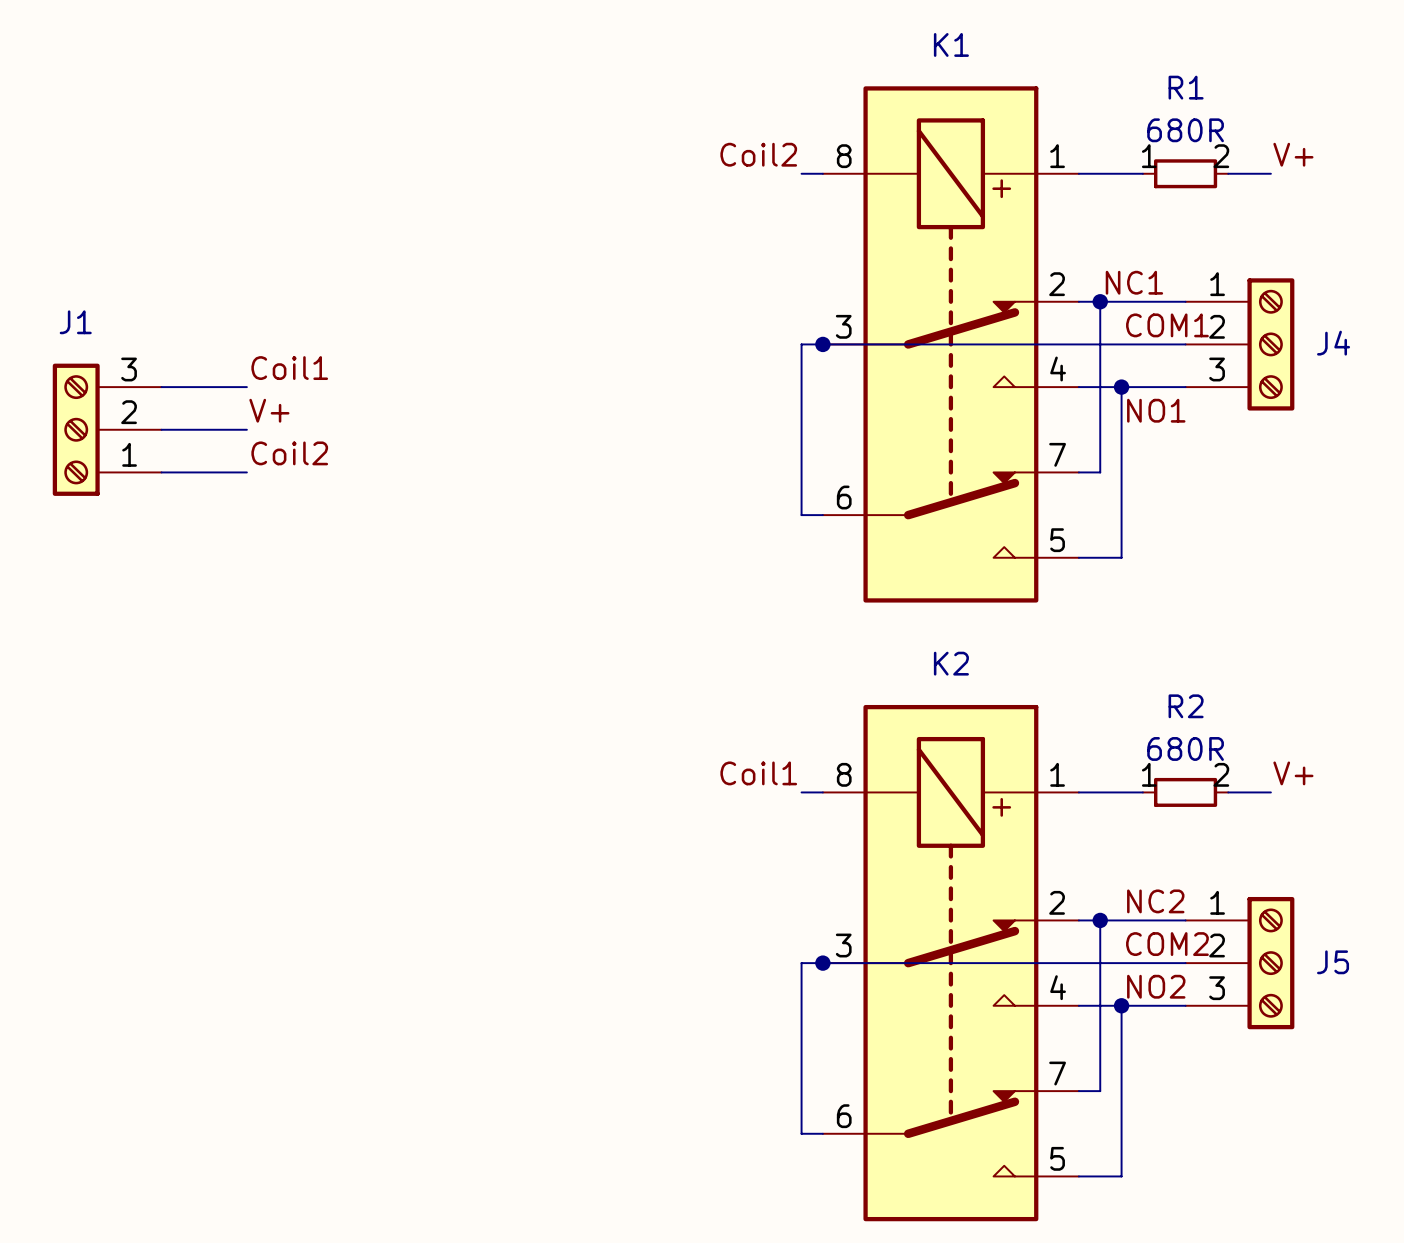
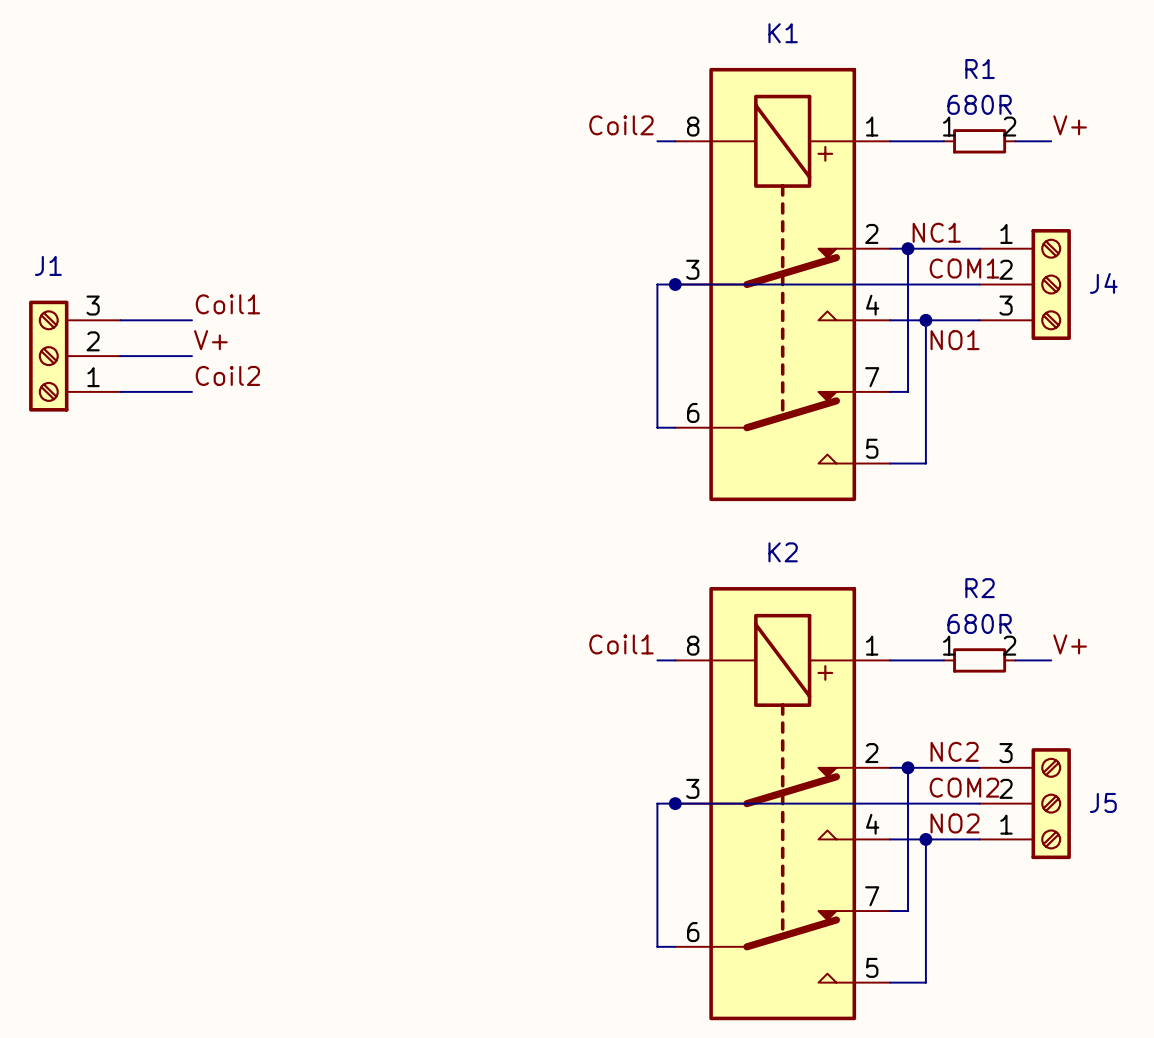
J5 flip: as is (1270, 963) -> up-down (1051, 803)

